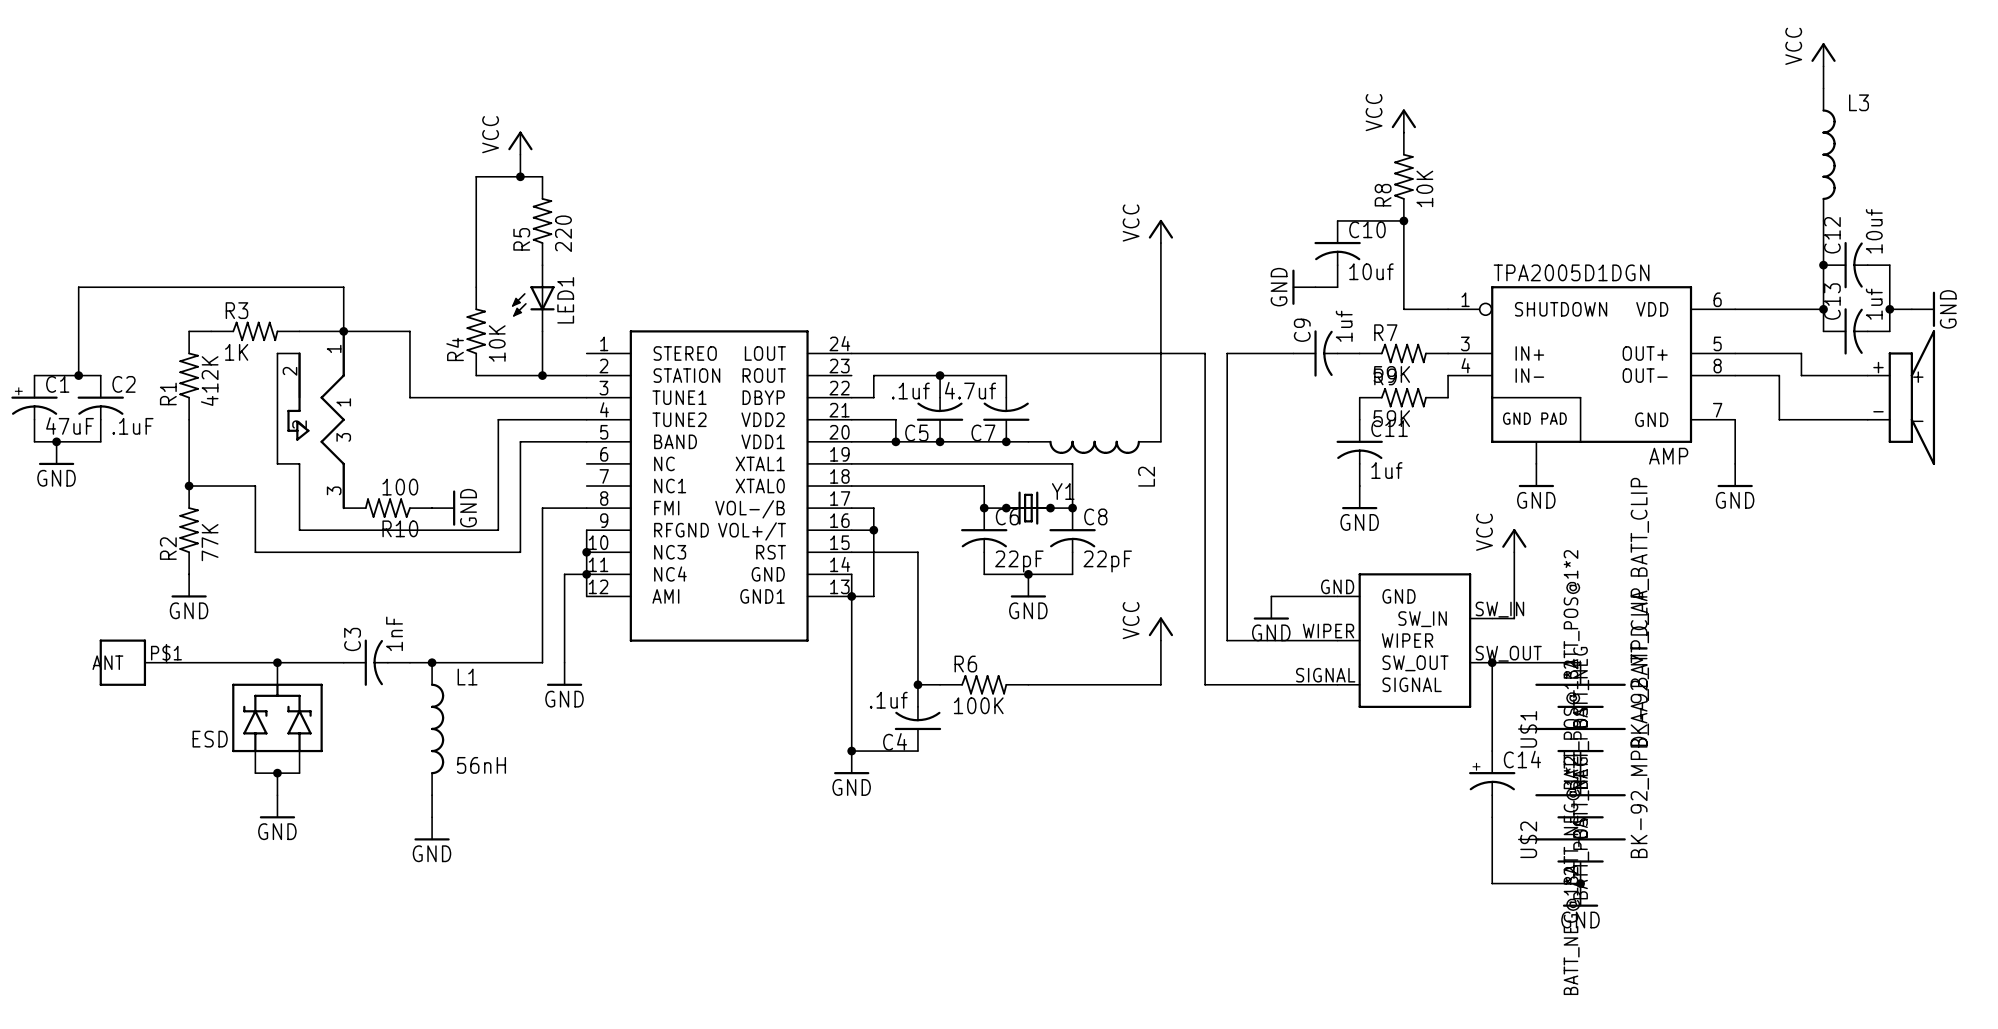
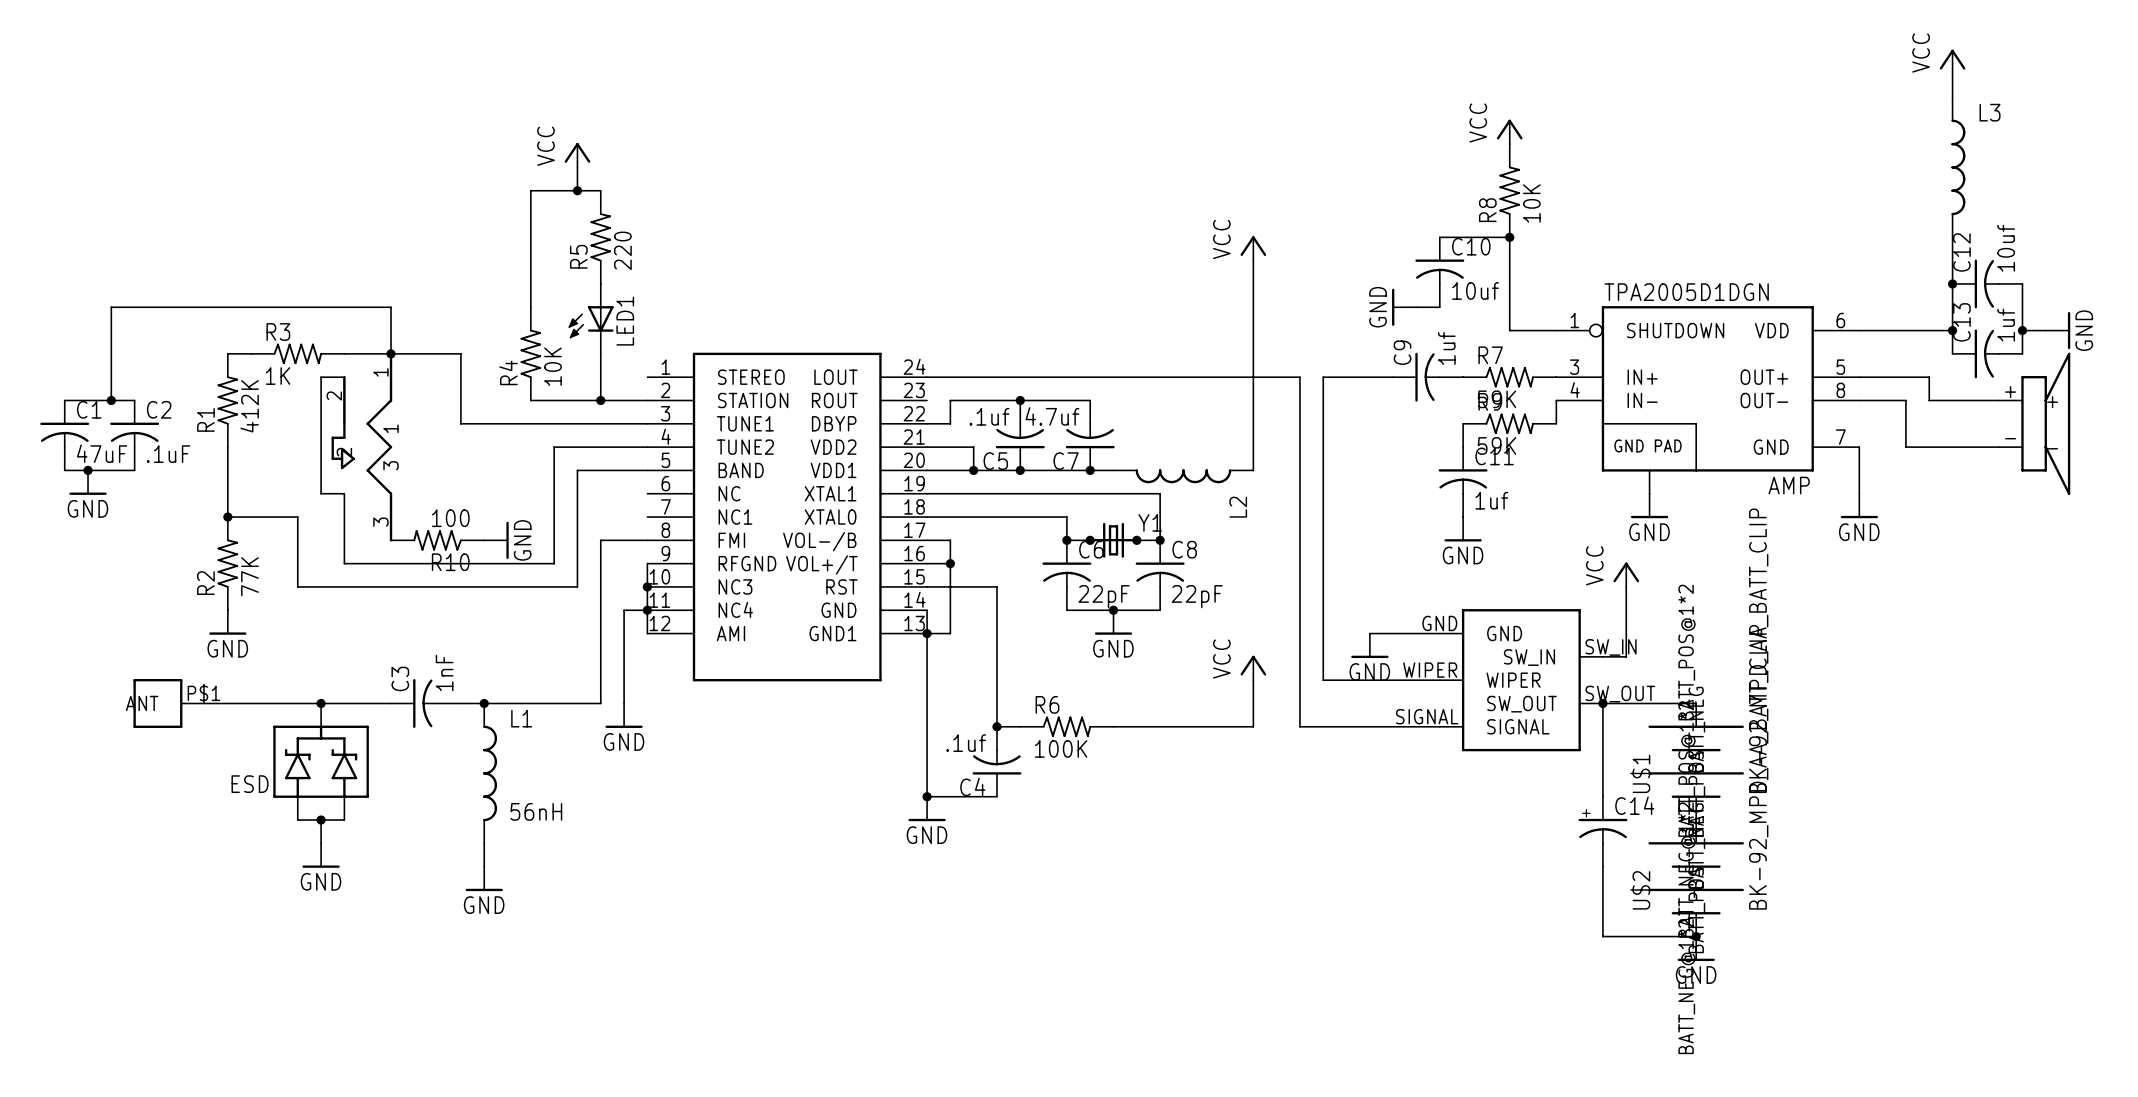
C1 symbol: [11, 375, 58, 442] -> [40, 400, 90, 471]

